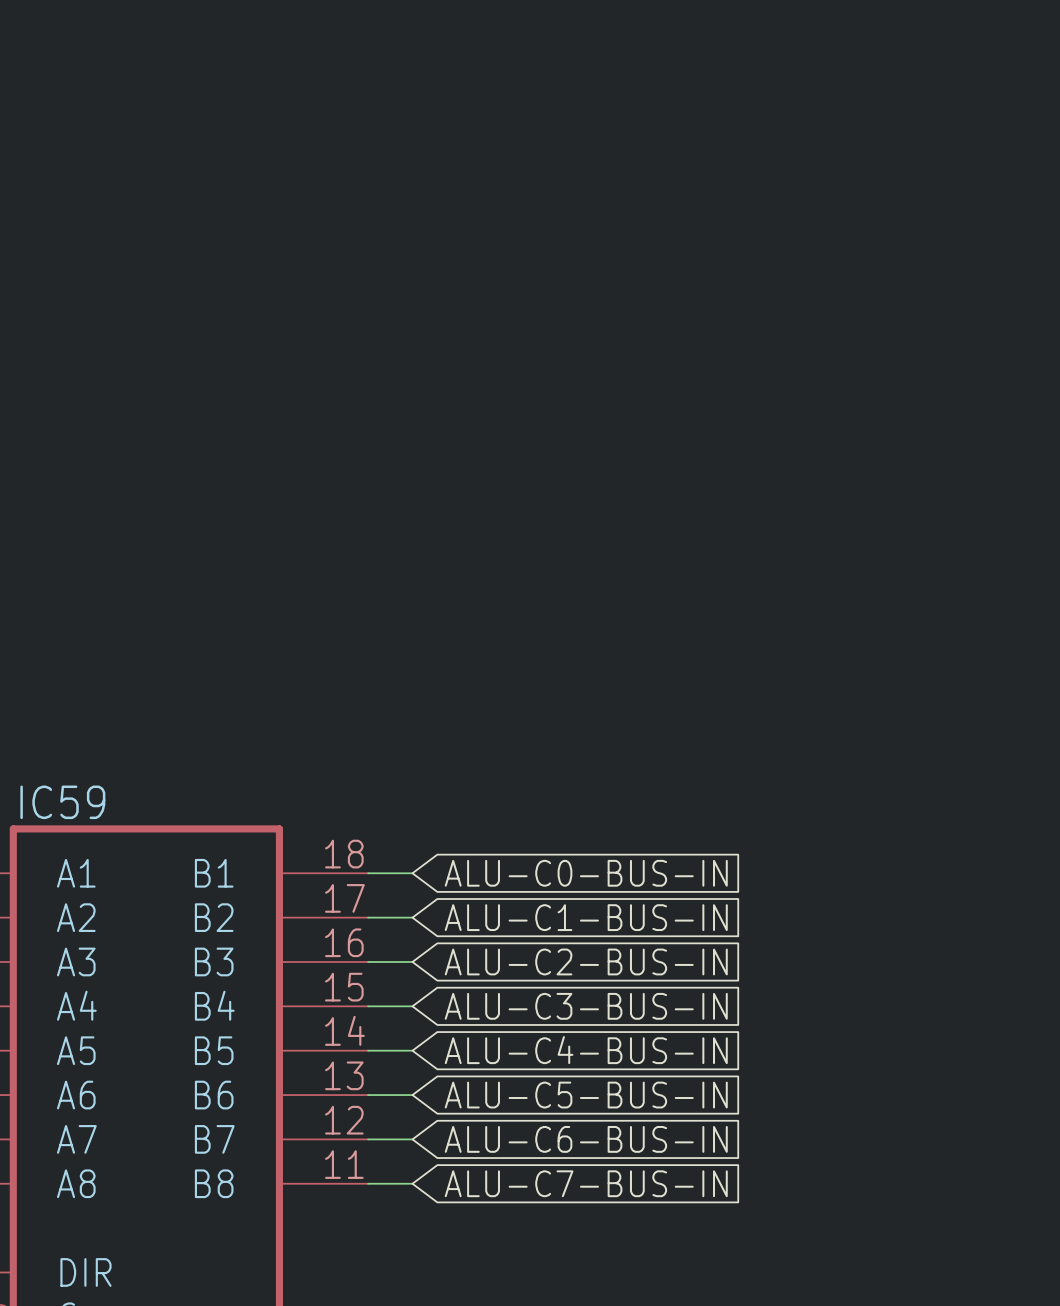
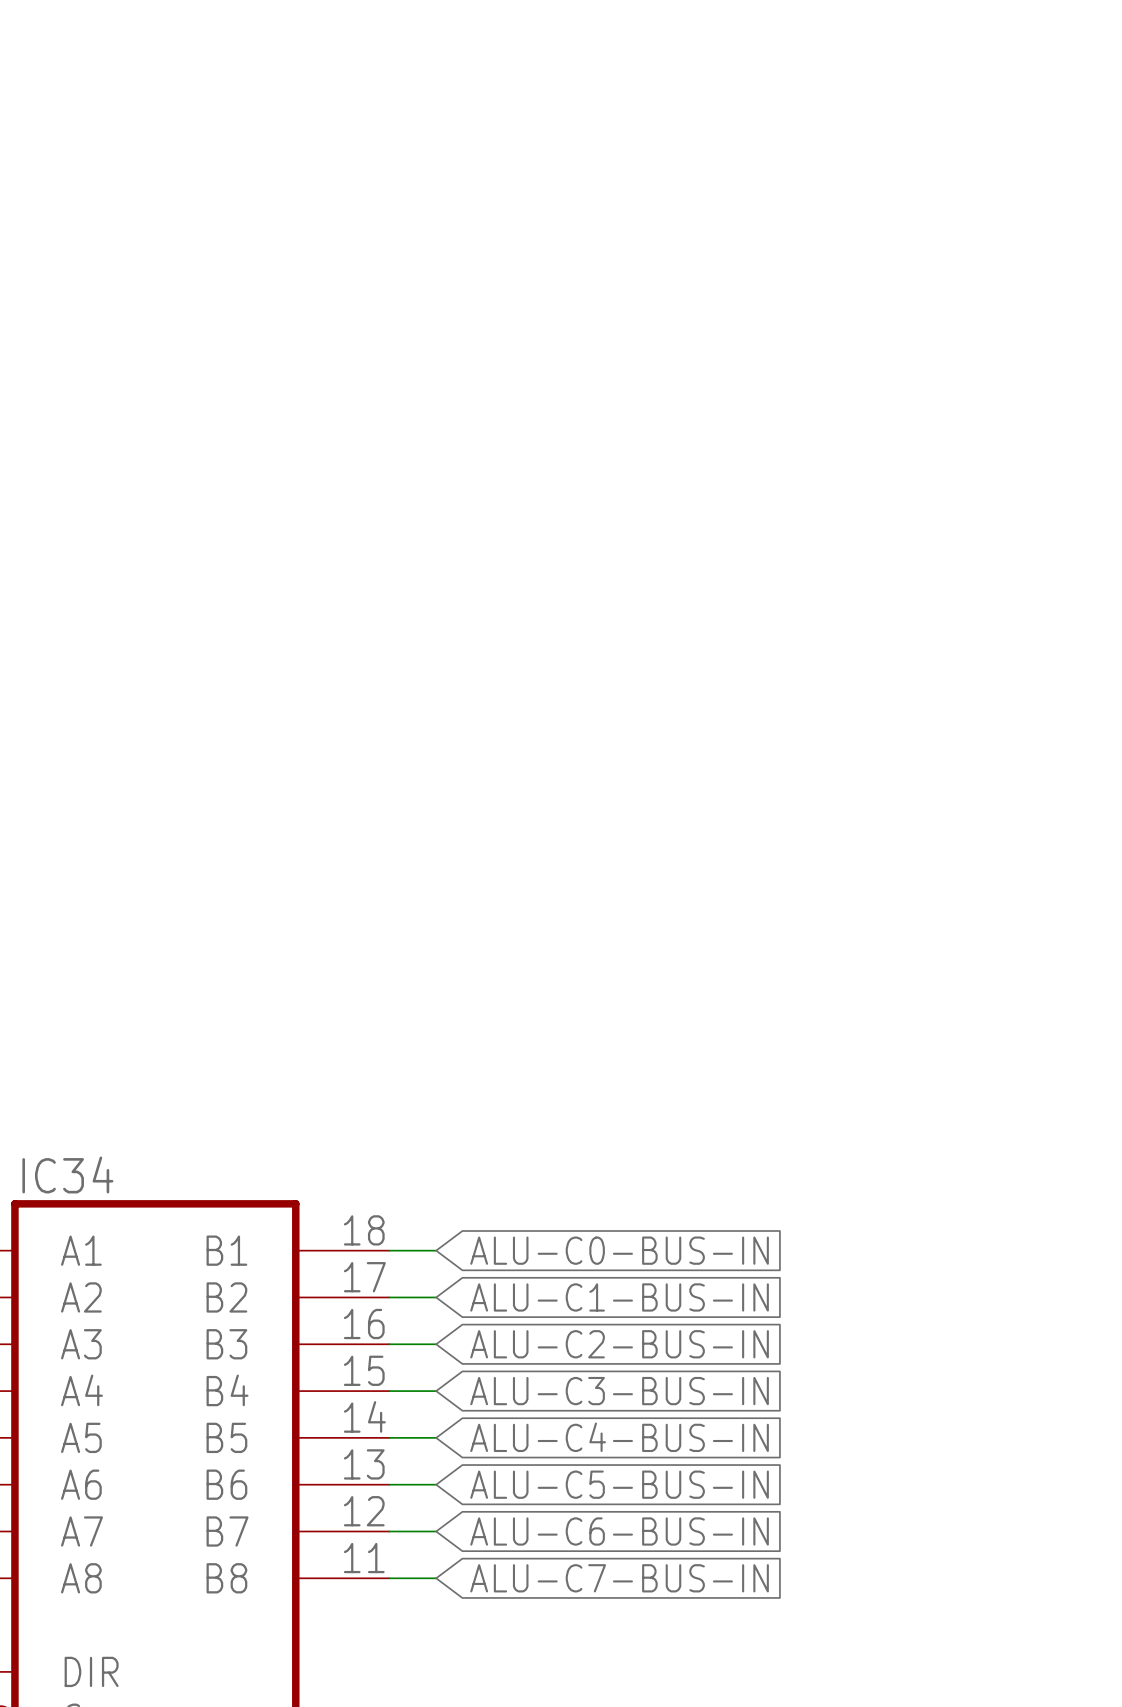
IC59 name: IC59 (62, 802) -> IC34 (67, 1174)

